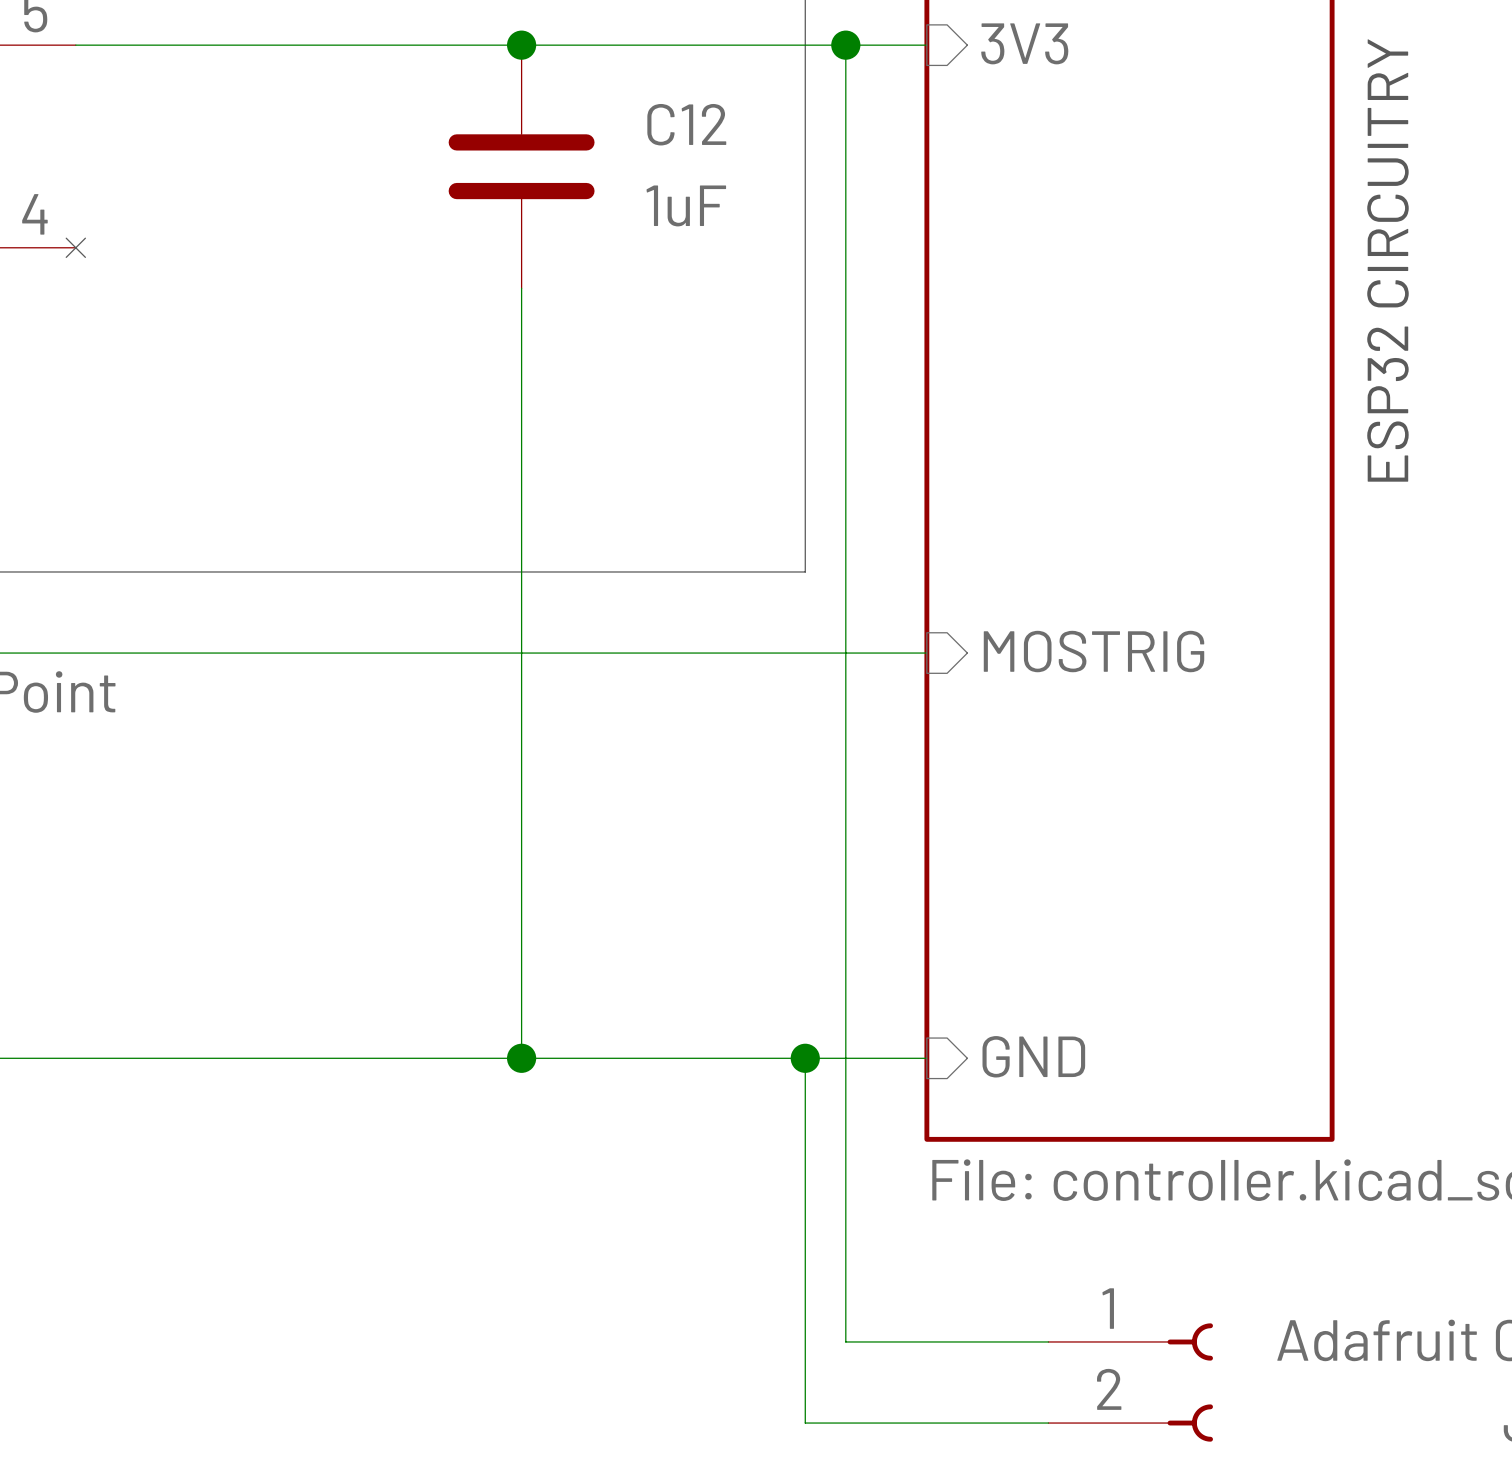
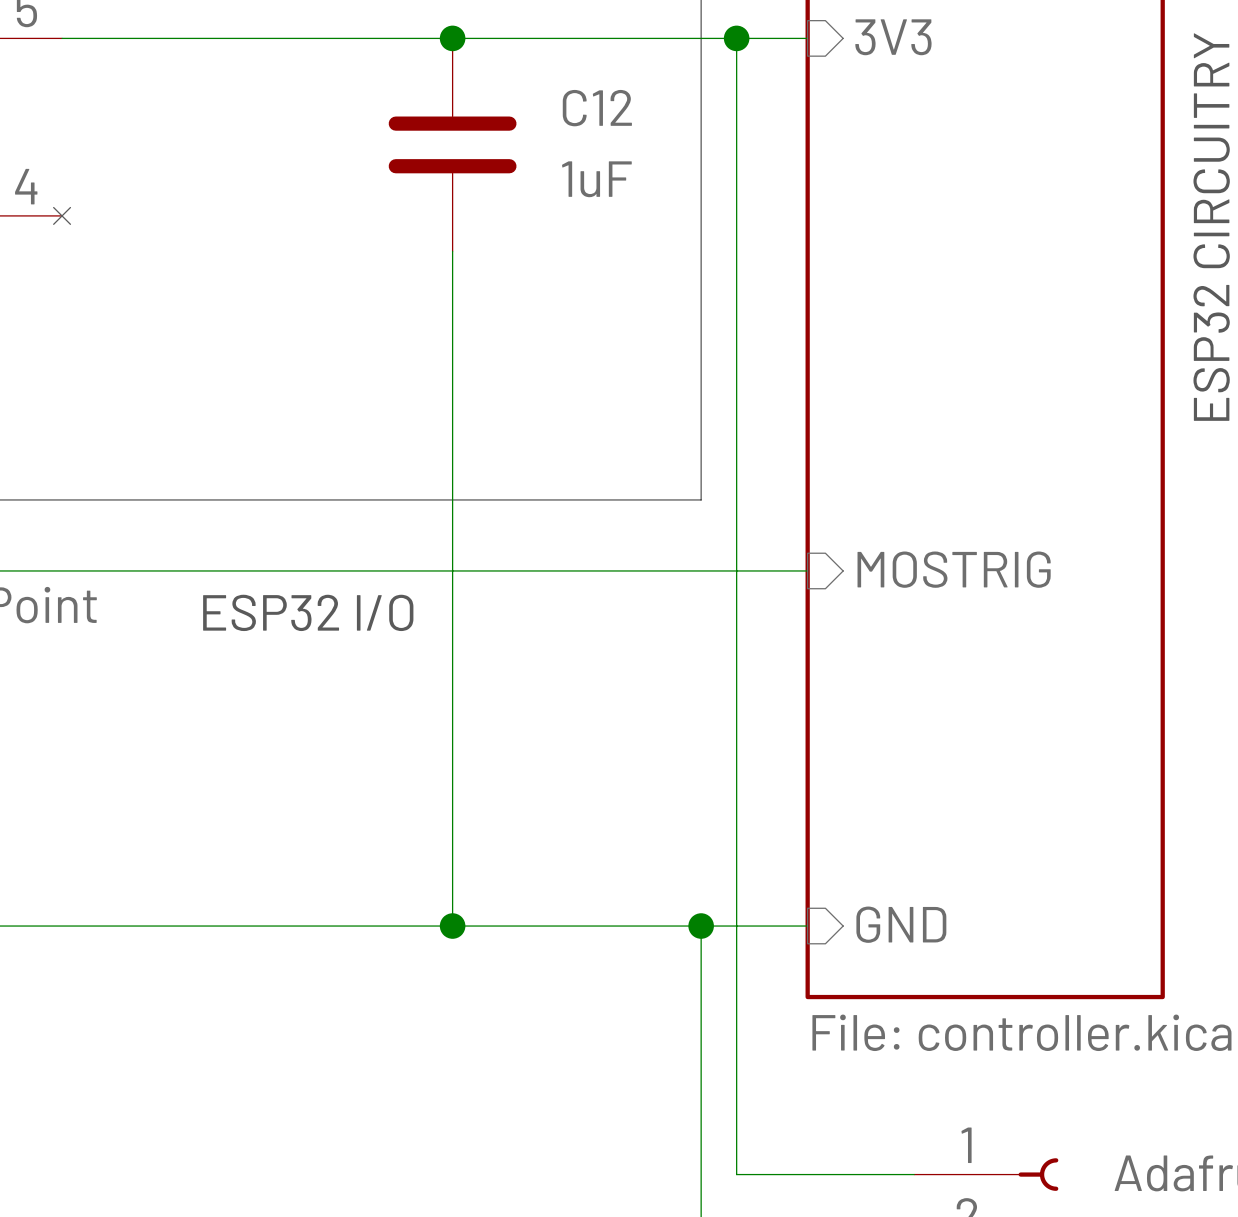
text: none -> ESP32 I/O (308, 612)

